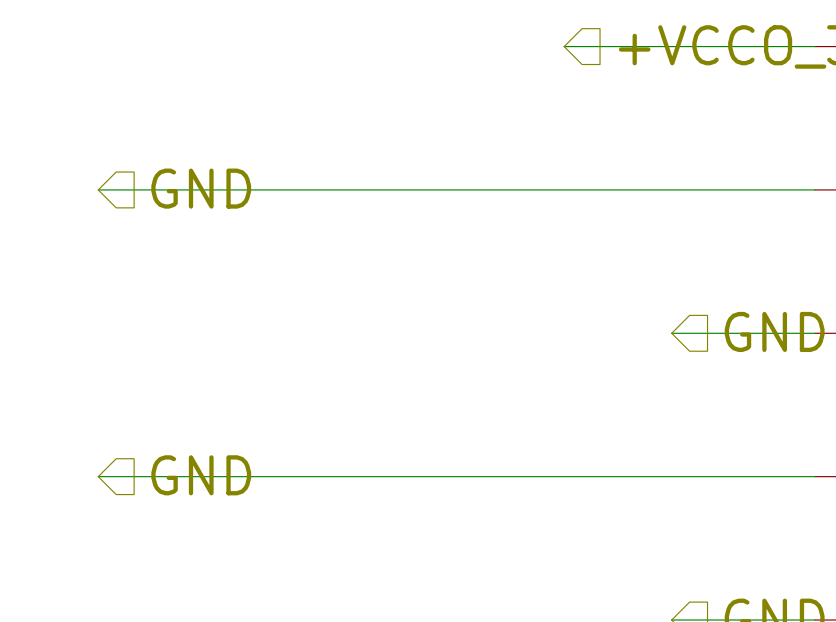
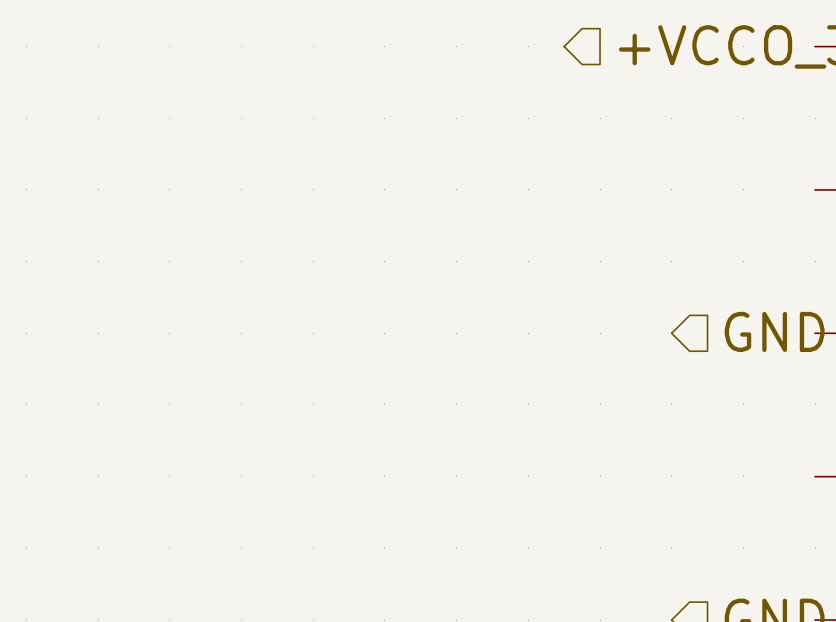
wire: (564, 46) (815, 46) -> none
hierarchical label: GND (201, 188) -> none
wire: (98, 189) (815, 189) -> none
wire: (671, 333) (815, 333) -> none
hierarchical label: GND (201, 475) -> none
wire: (98, 476) (815, 476) -> none
wire: (671, 620) (815, 620) -> none

